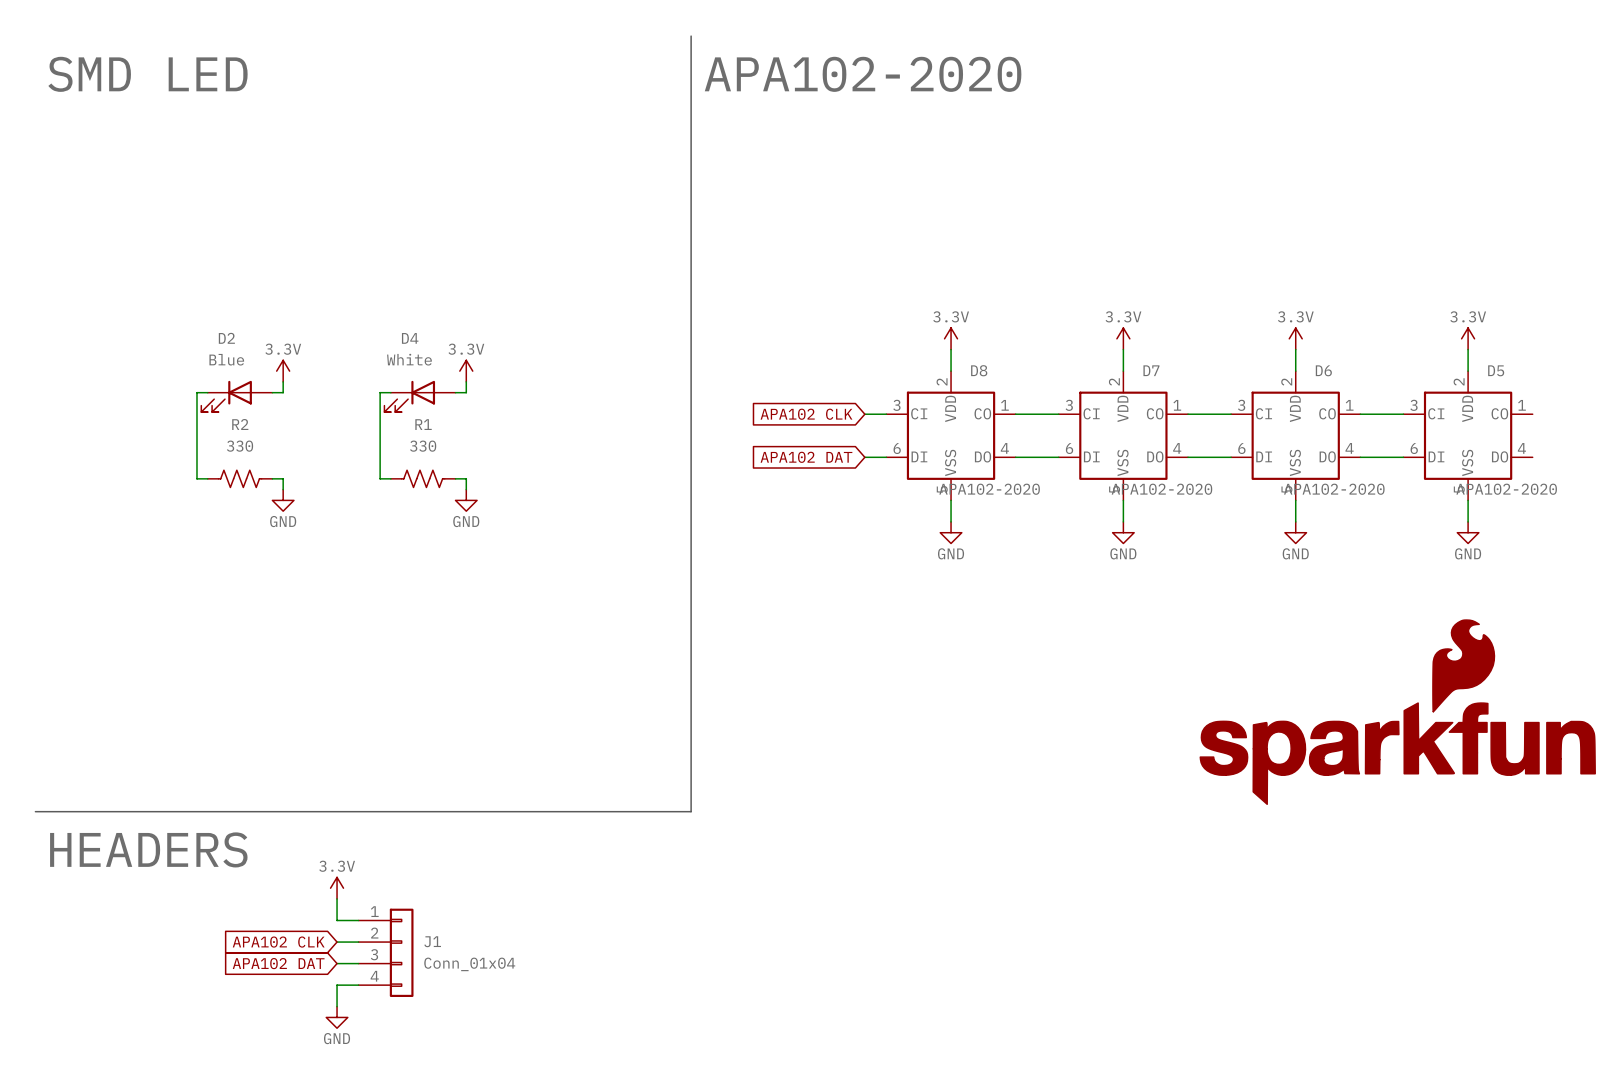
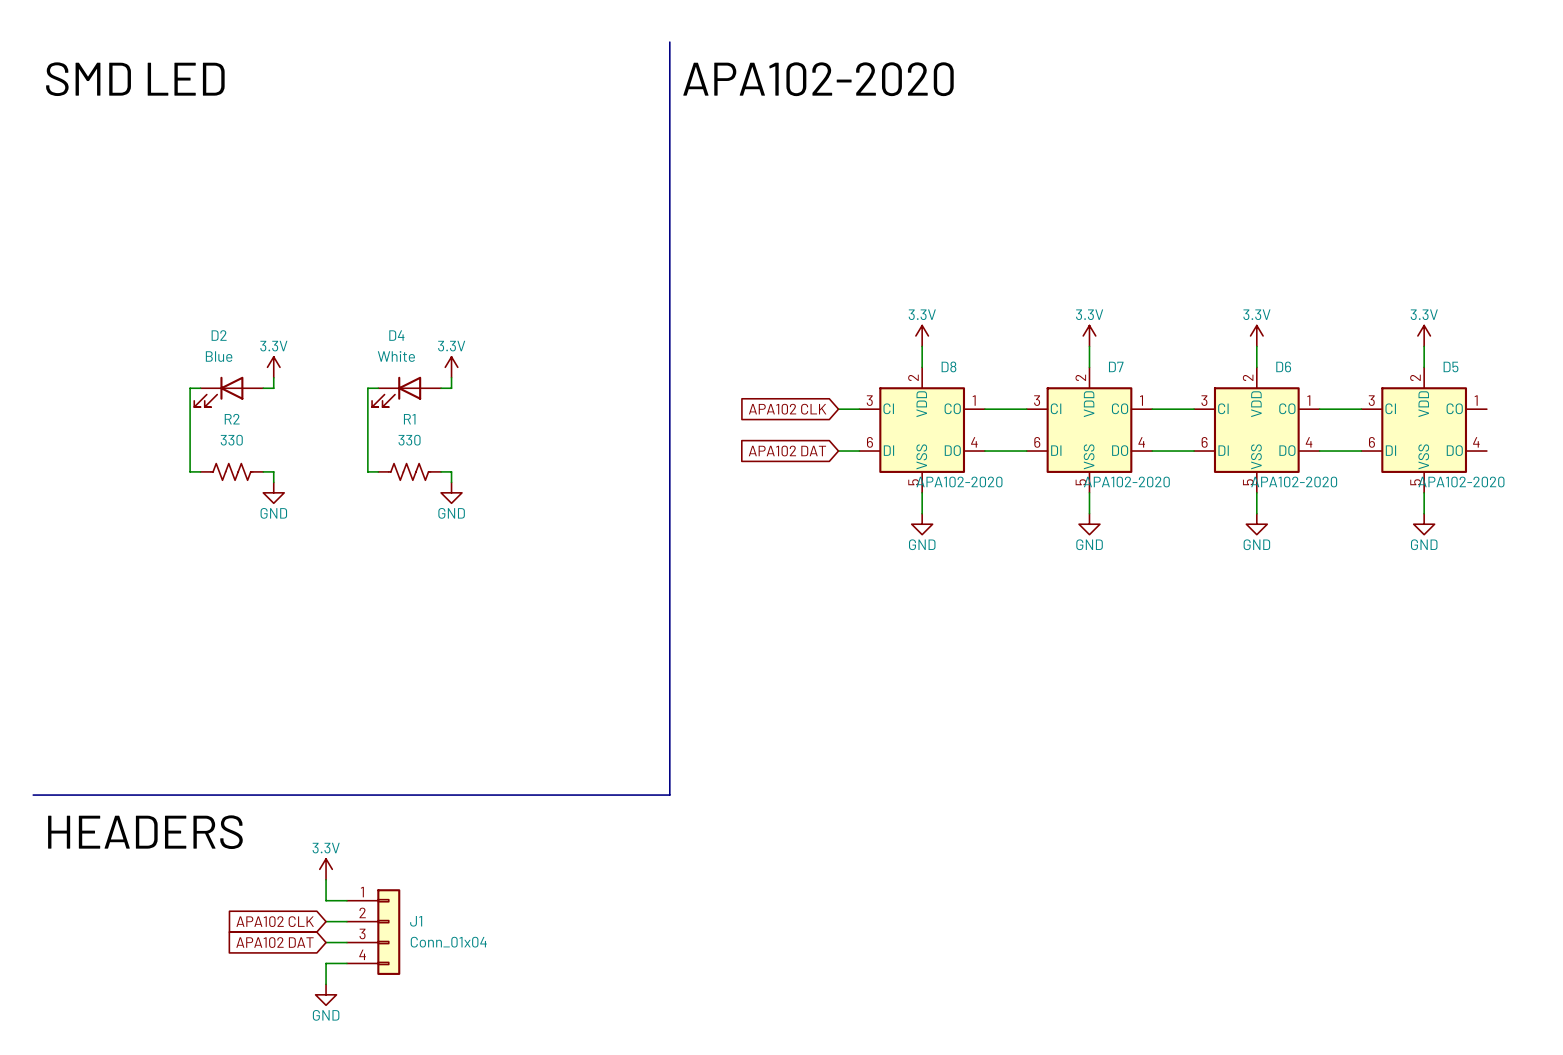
part: (1397, 712) -> none

